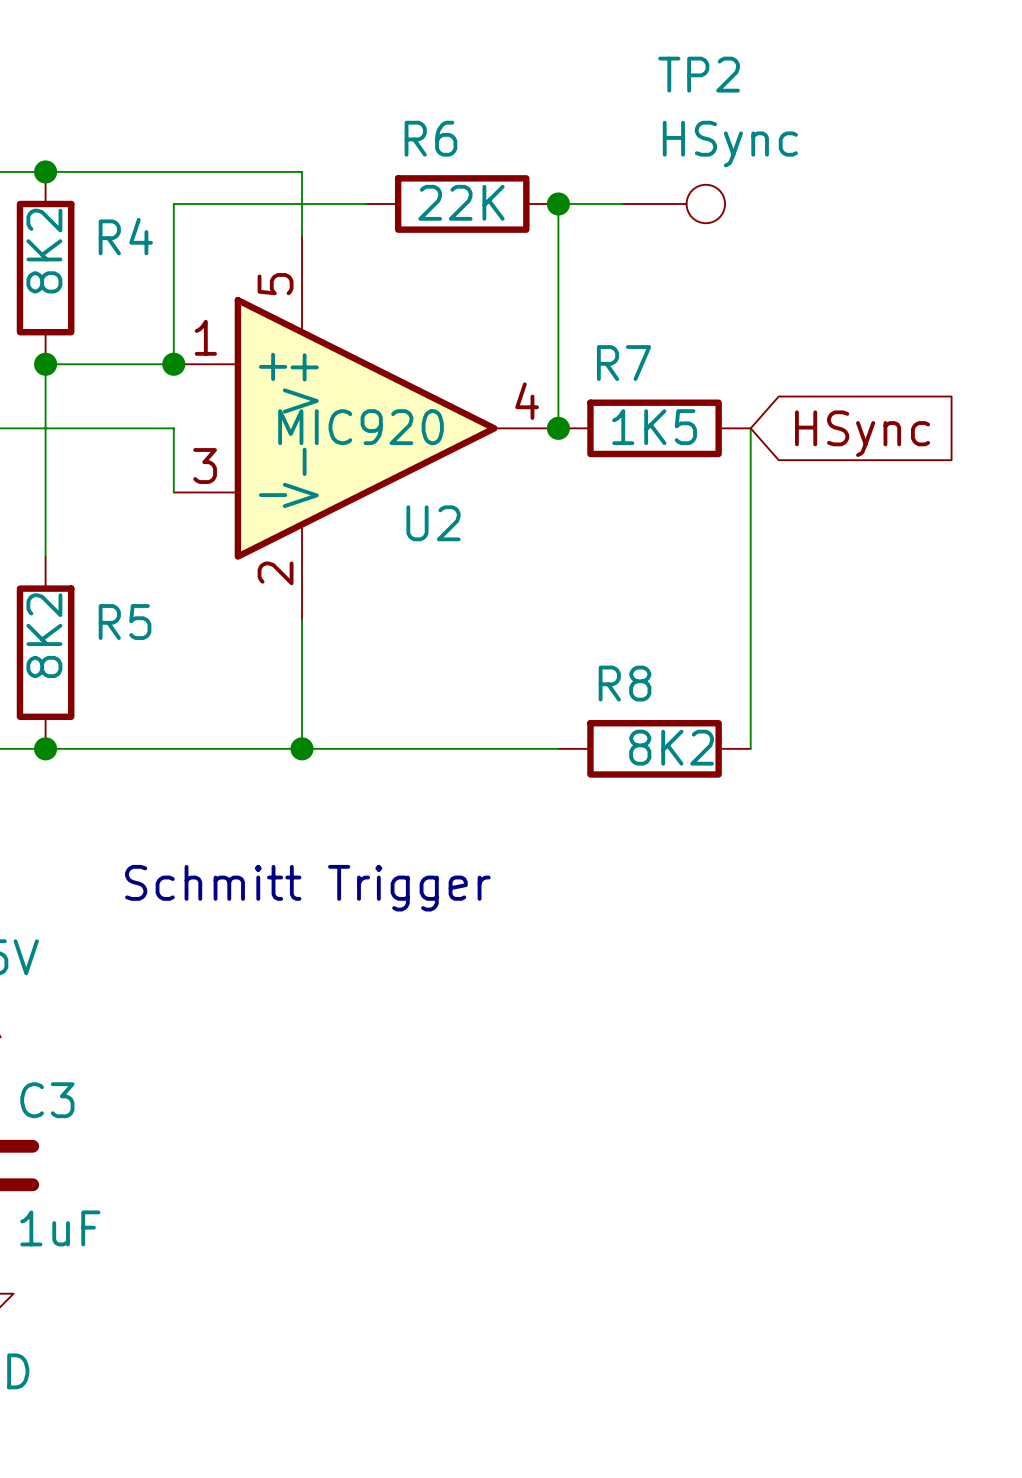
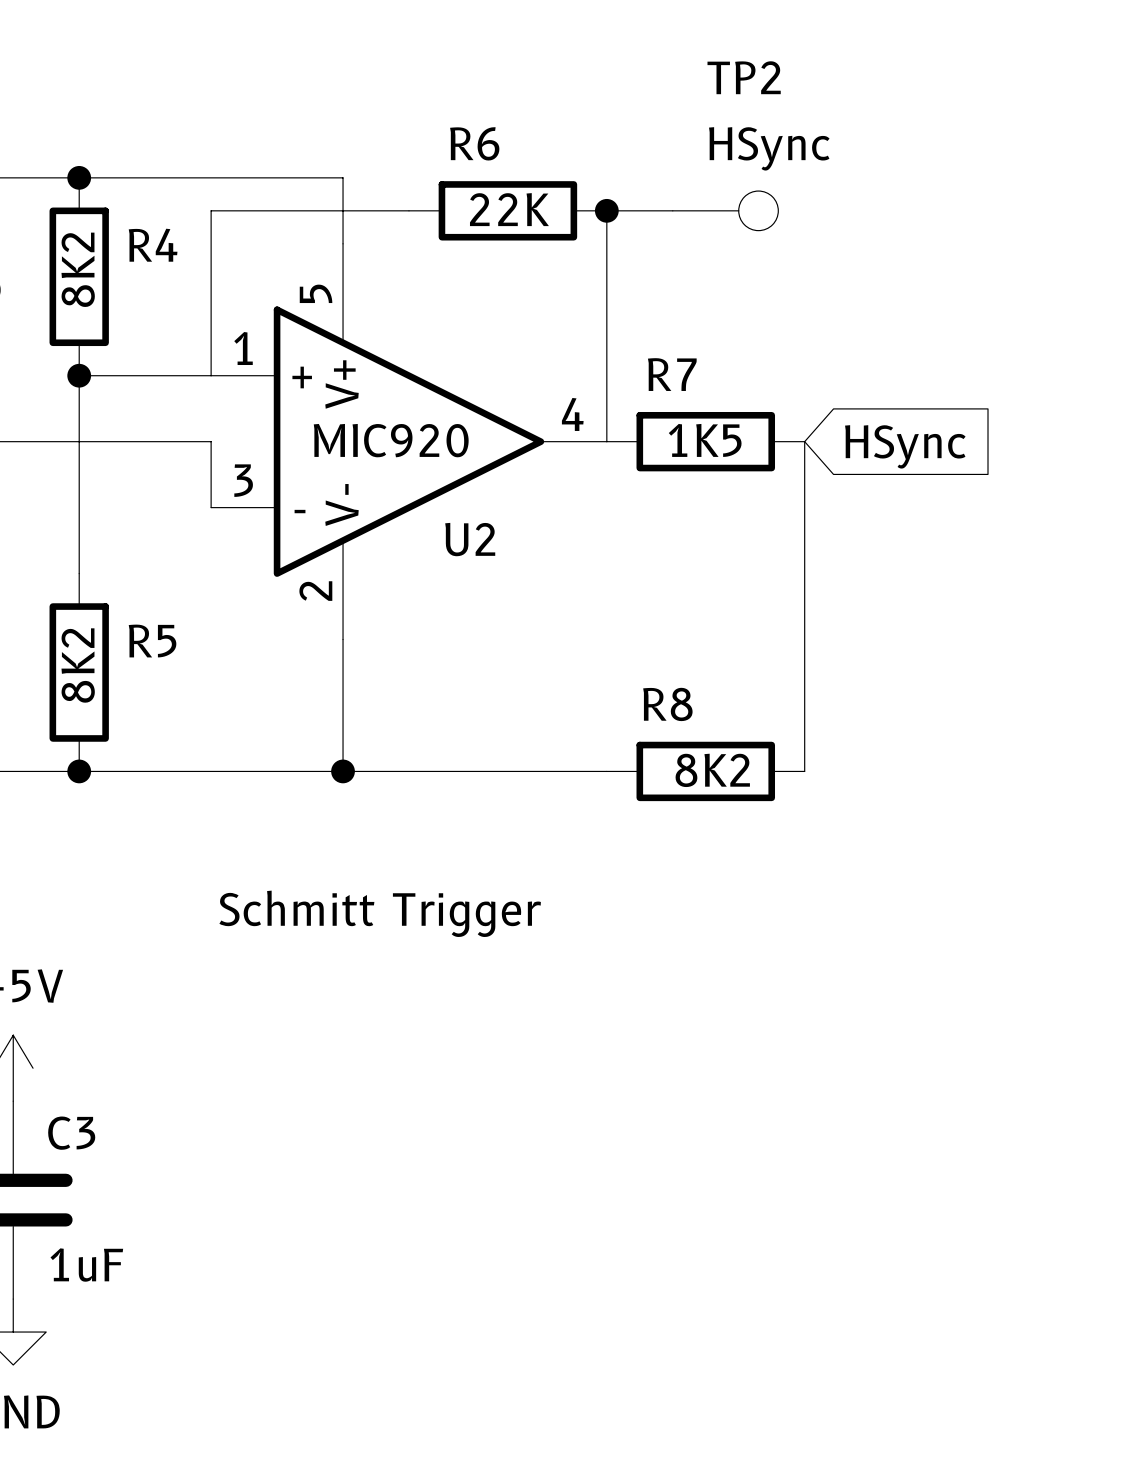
junction: (173, 364) -> none
junction: (558, 428) -> none

